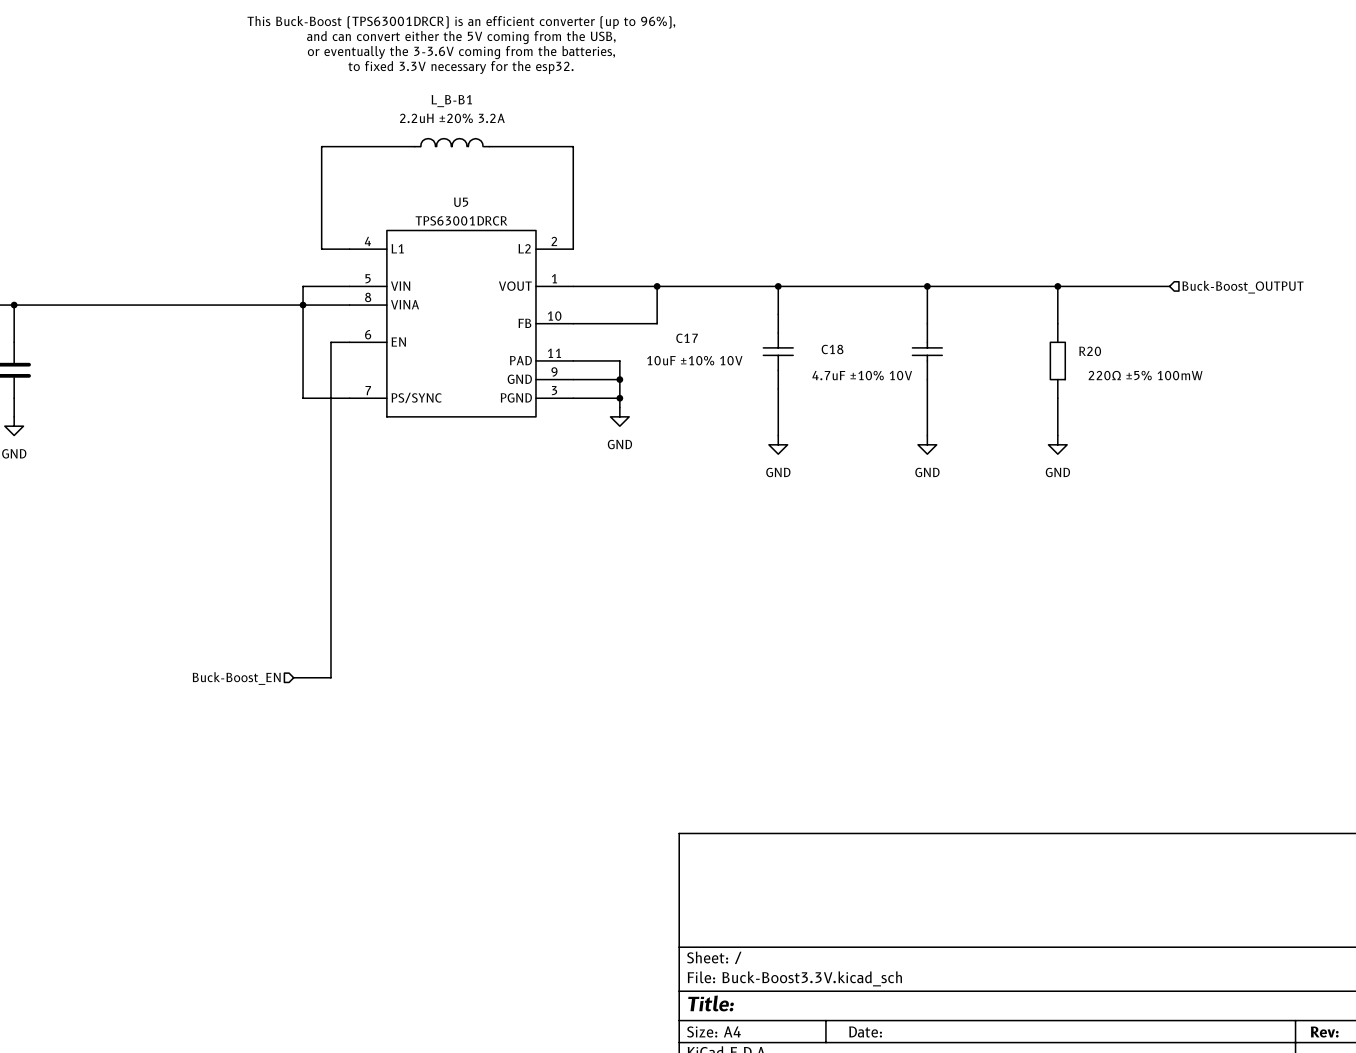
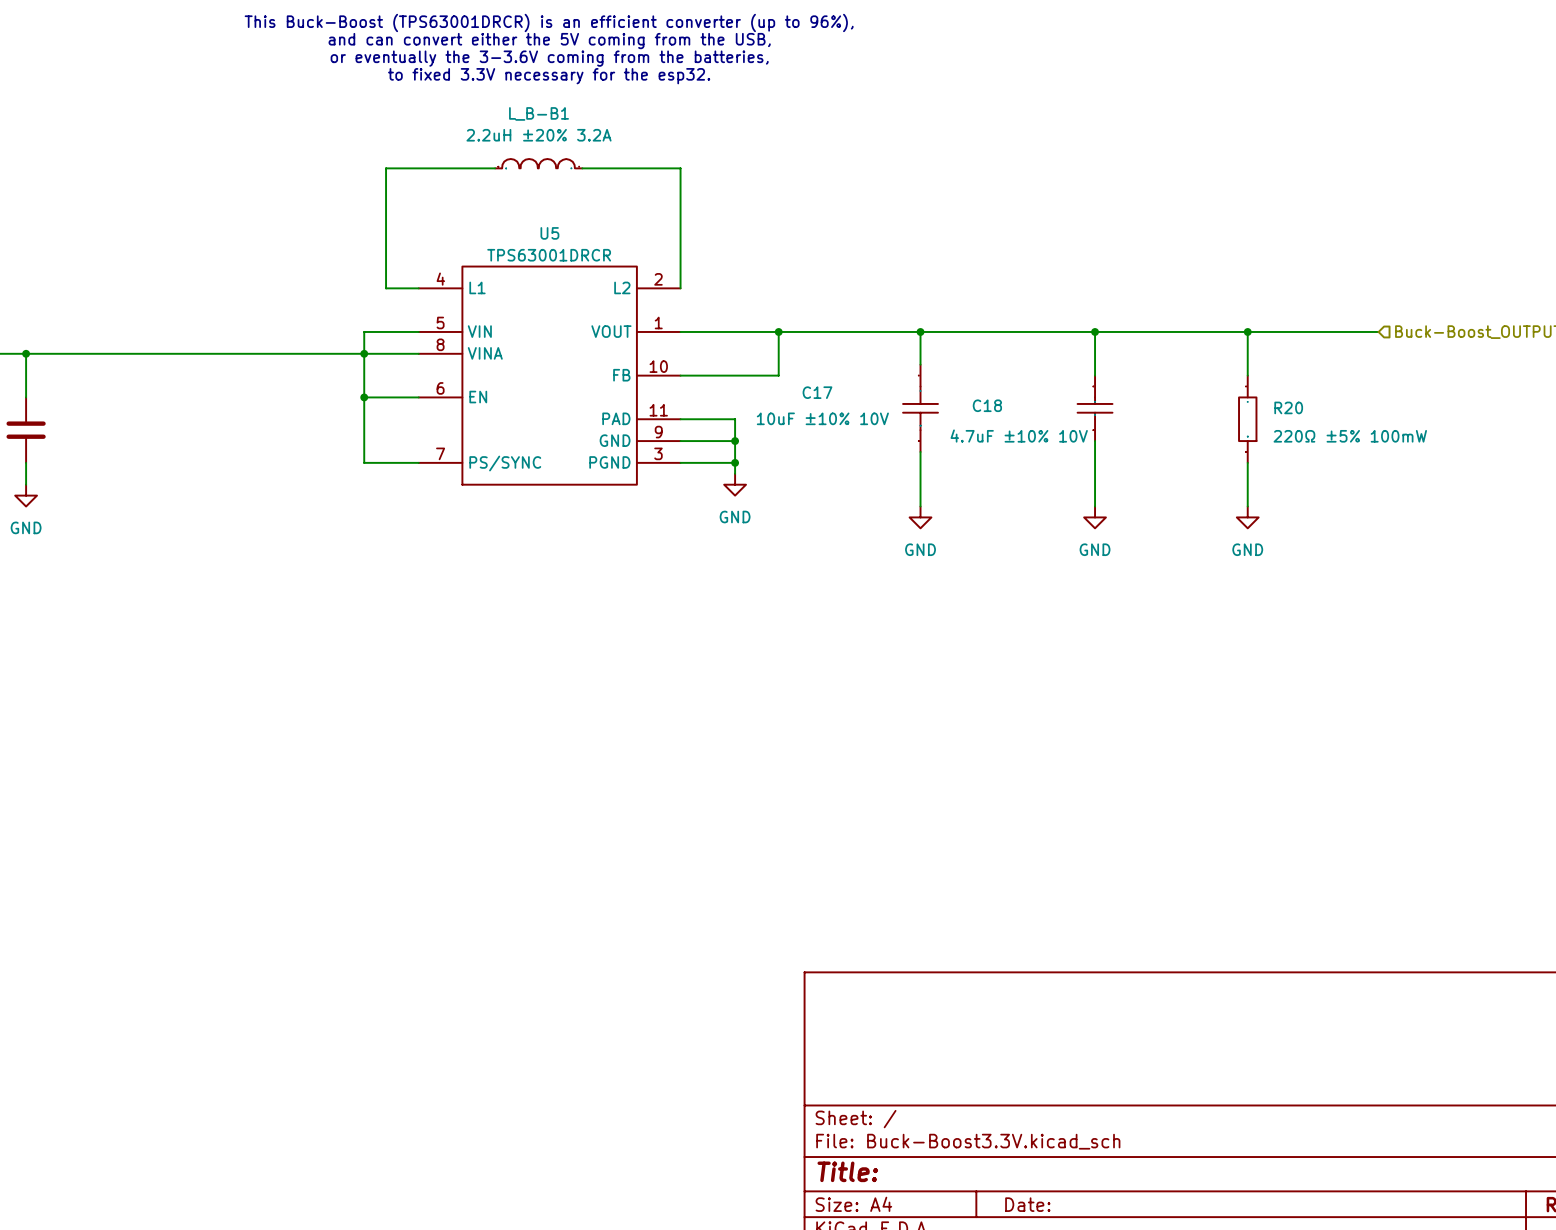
junction: none -> (364, 397)
wire: (330, 342) (330, 677) (293, 677) -> (396, 397) (364, 397)
hierarchical label: Buck-Boost_EN (236, 678) -> none

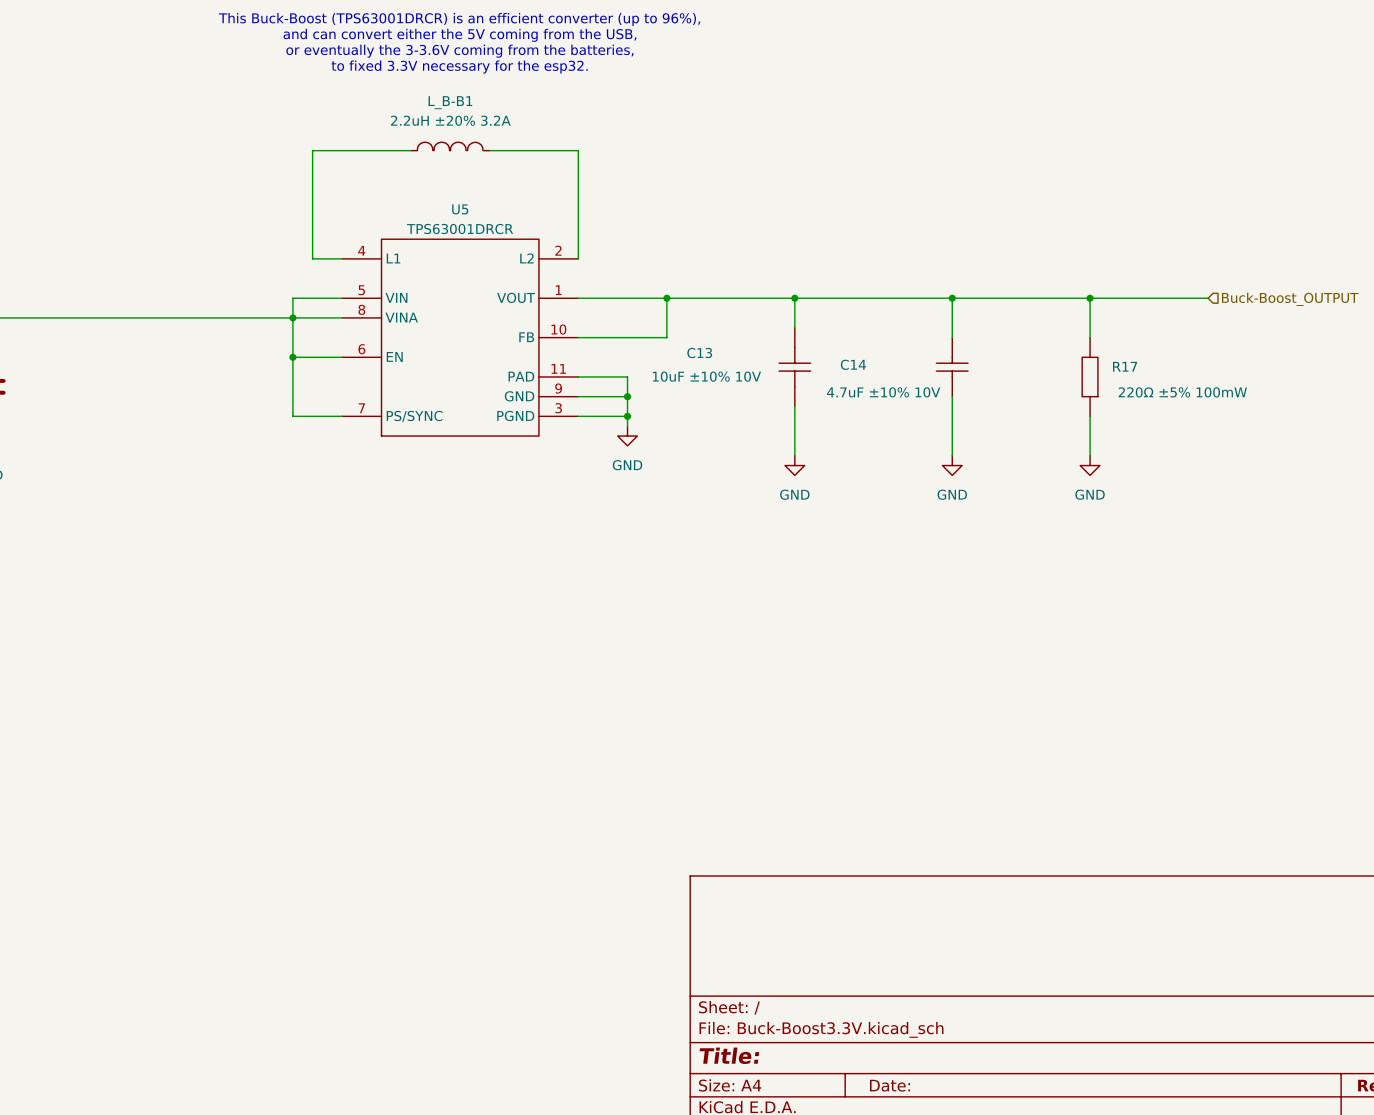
C17 name: C17 (817, 392) -> C13 (699, 353)
C18 name: C18 (987, 405) -> C14 (853, 364)
R20 name: R20 (1288, 407) -> R17 (1125, 366)

